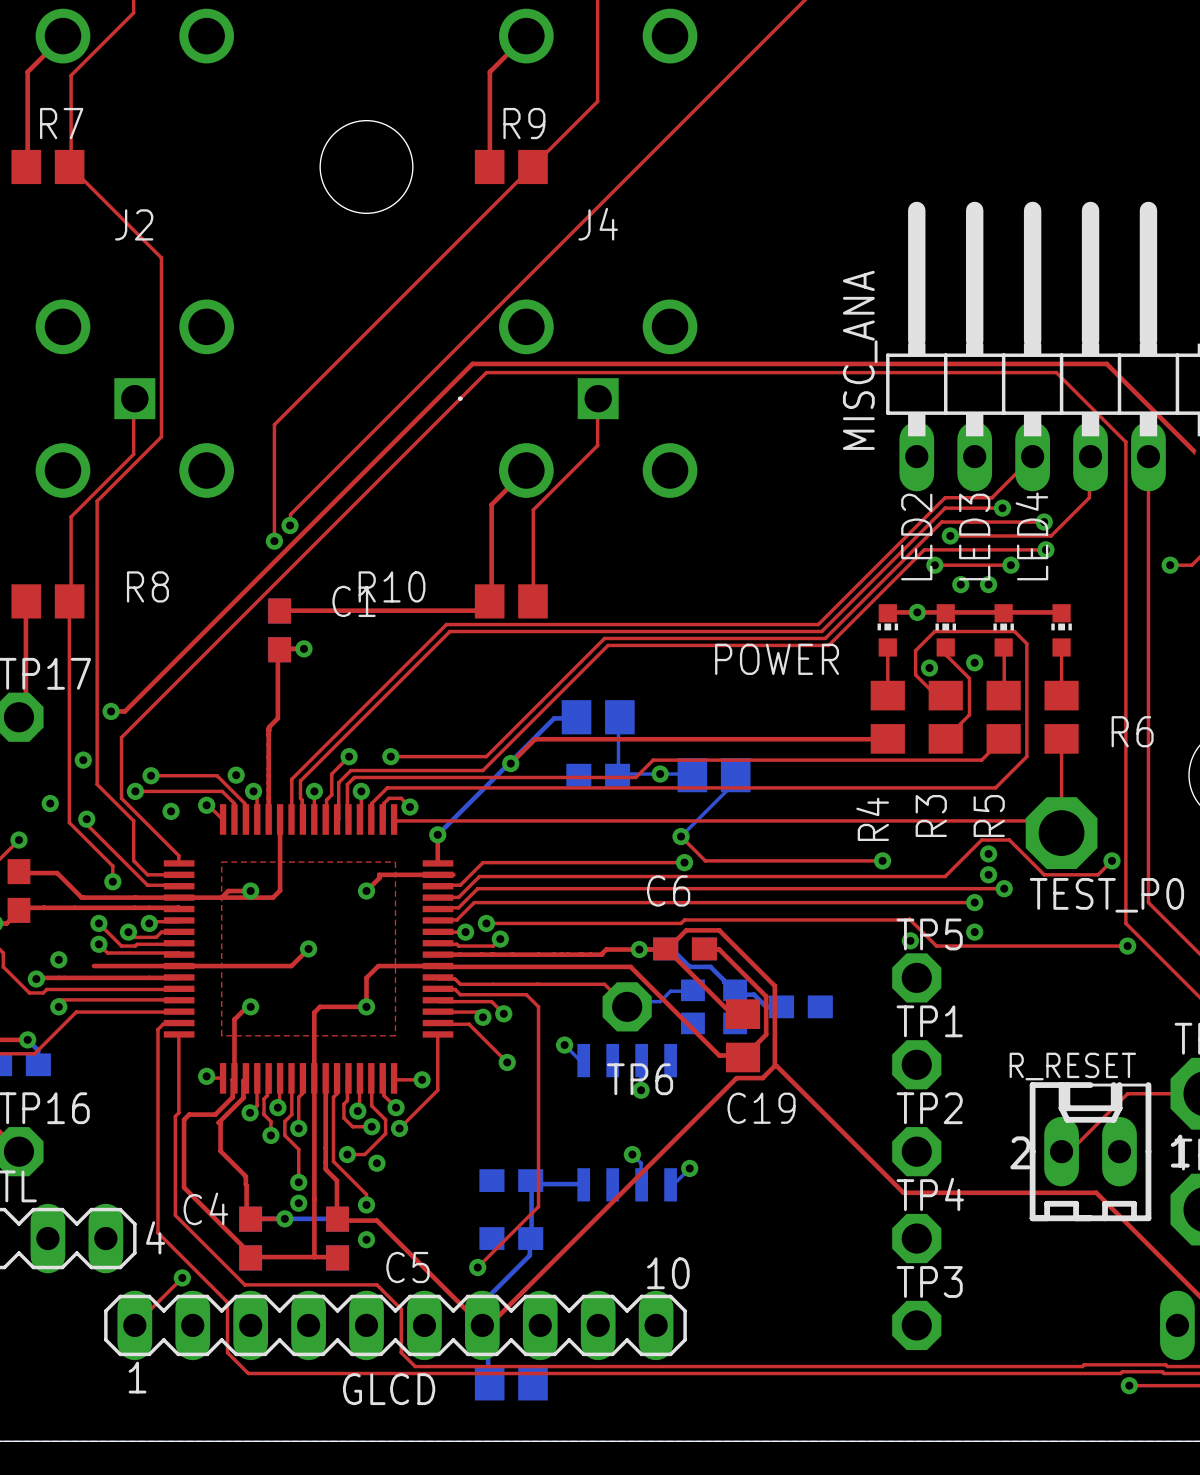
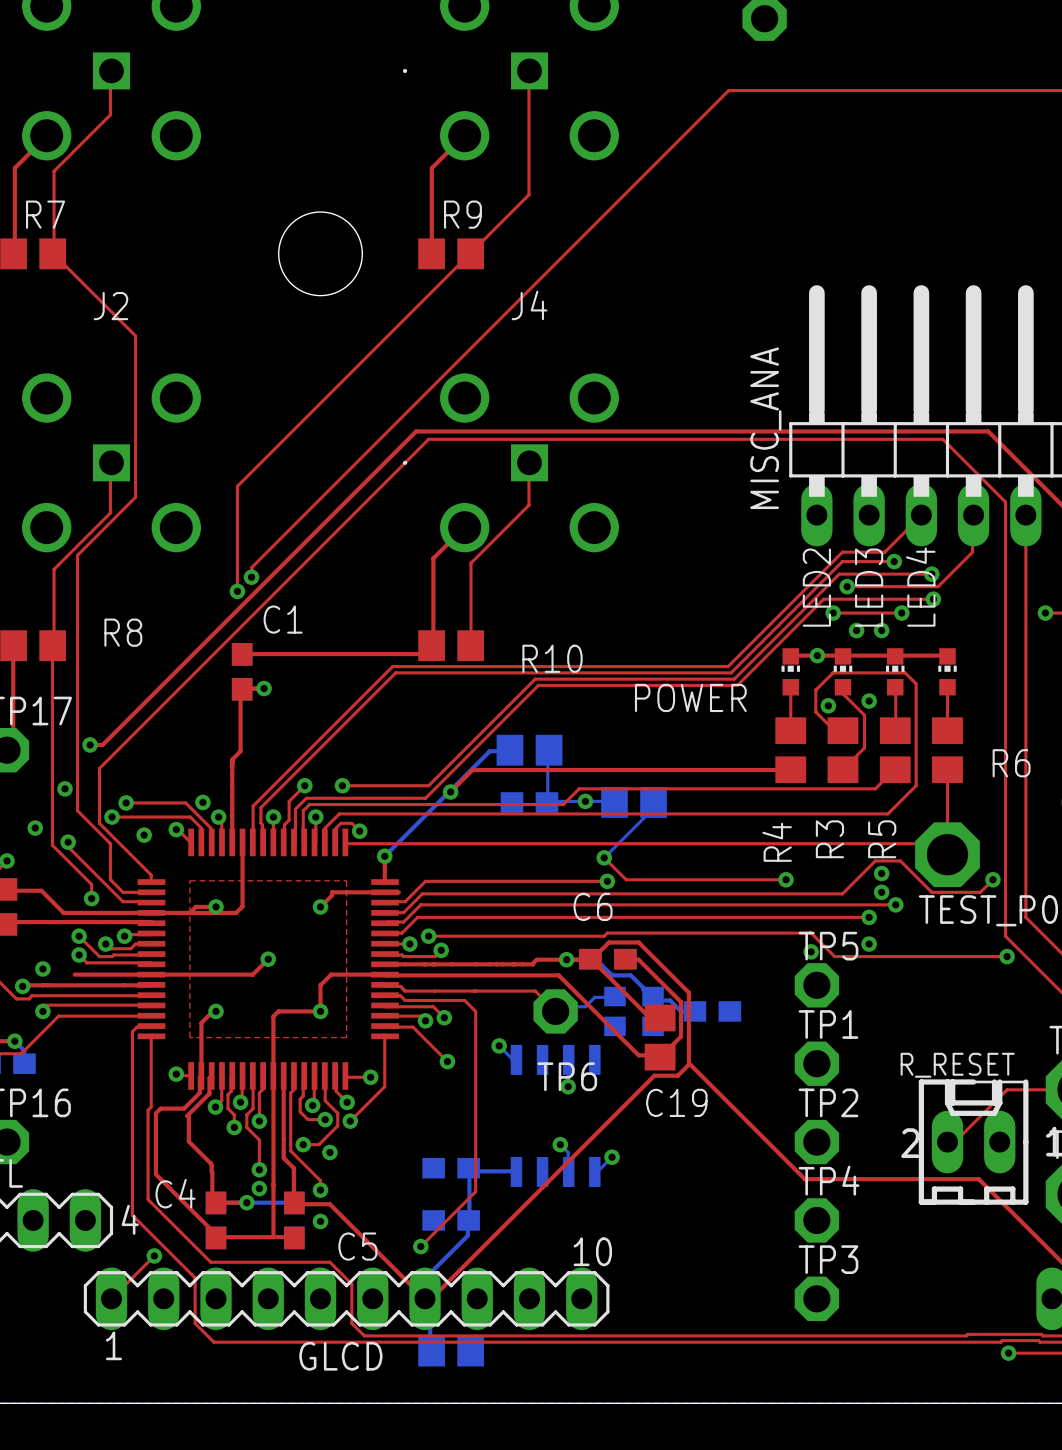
R10 name position: R10 (392, 586) -> R10 (552, 658)
C1 name position: C1 (354, 601) -> C1 (283, 619)

